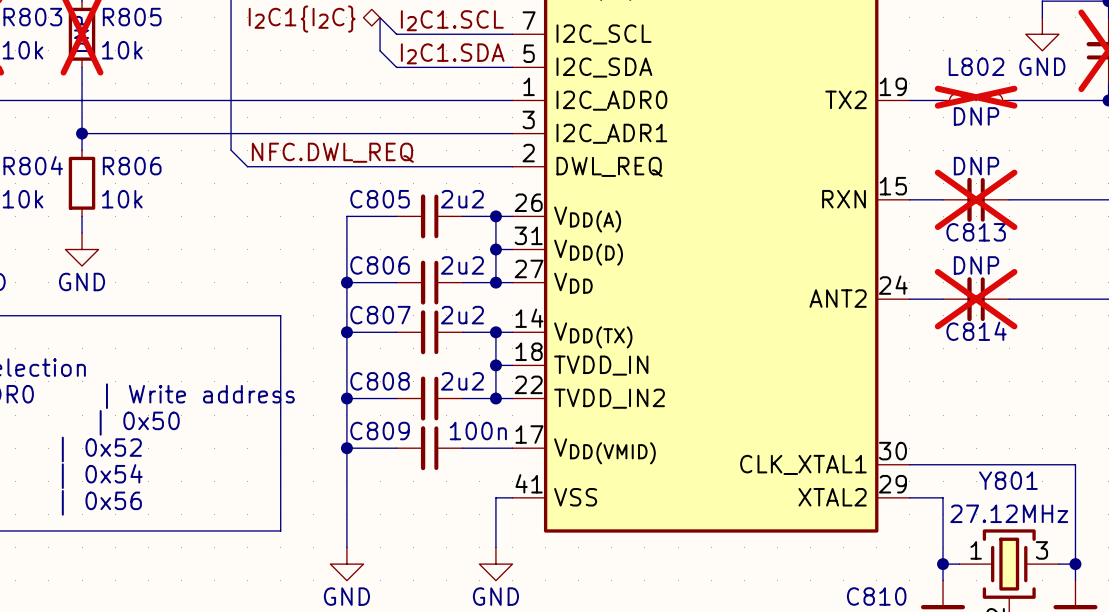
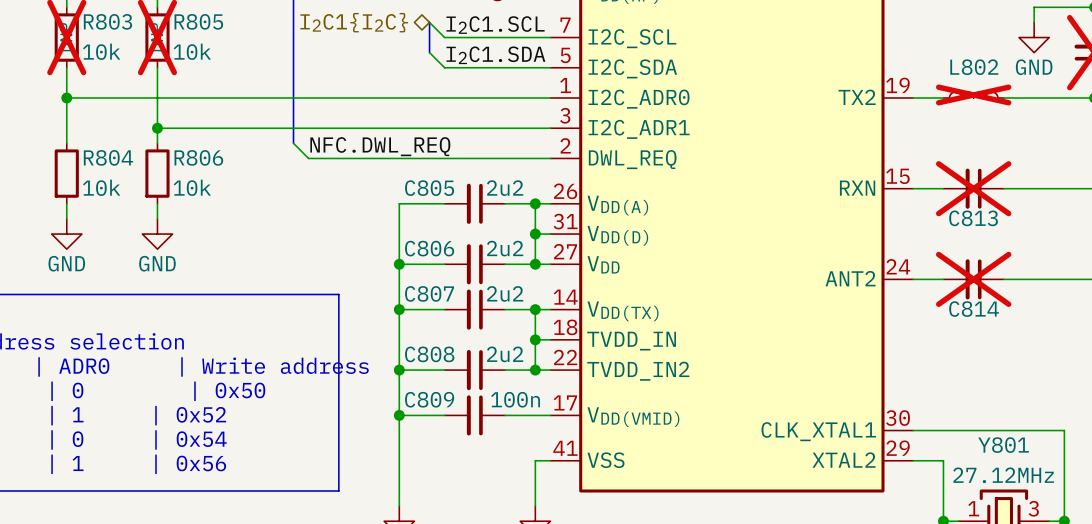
L802 text: DNP (976, 116) -> none
C813 text: DNP (976, 166) -> none
C814 text: DNP (976, 265) -> none

